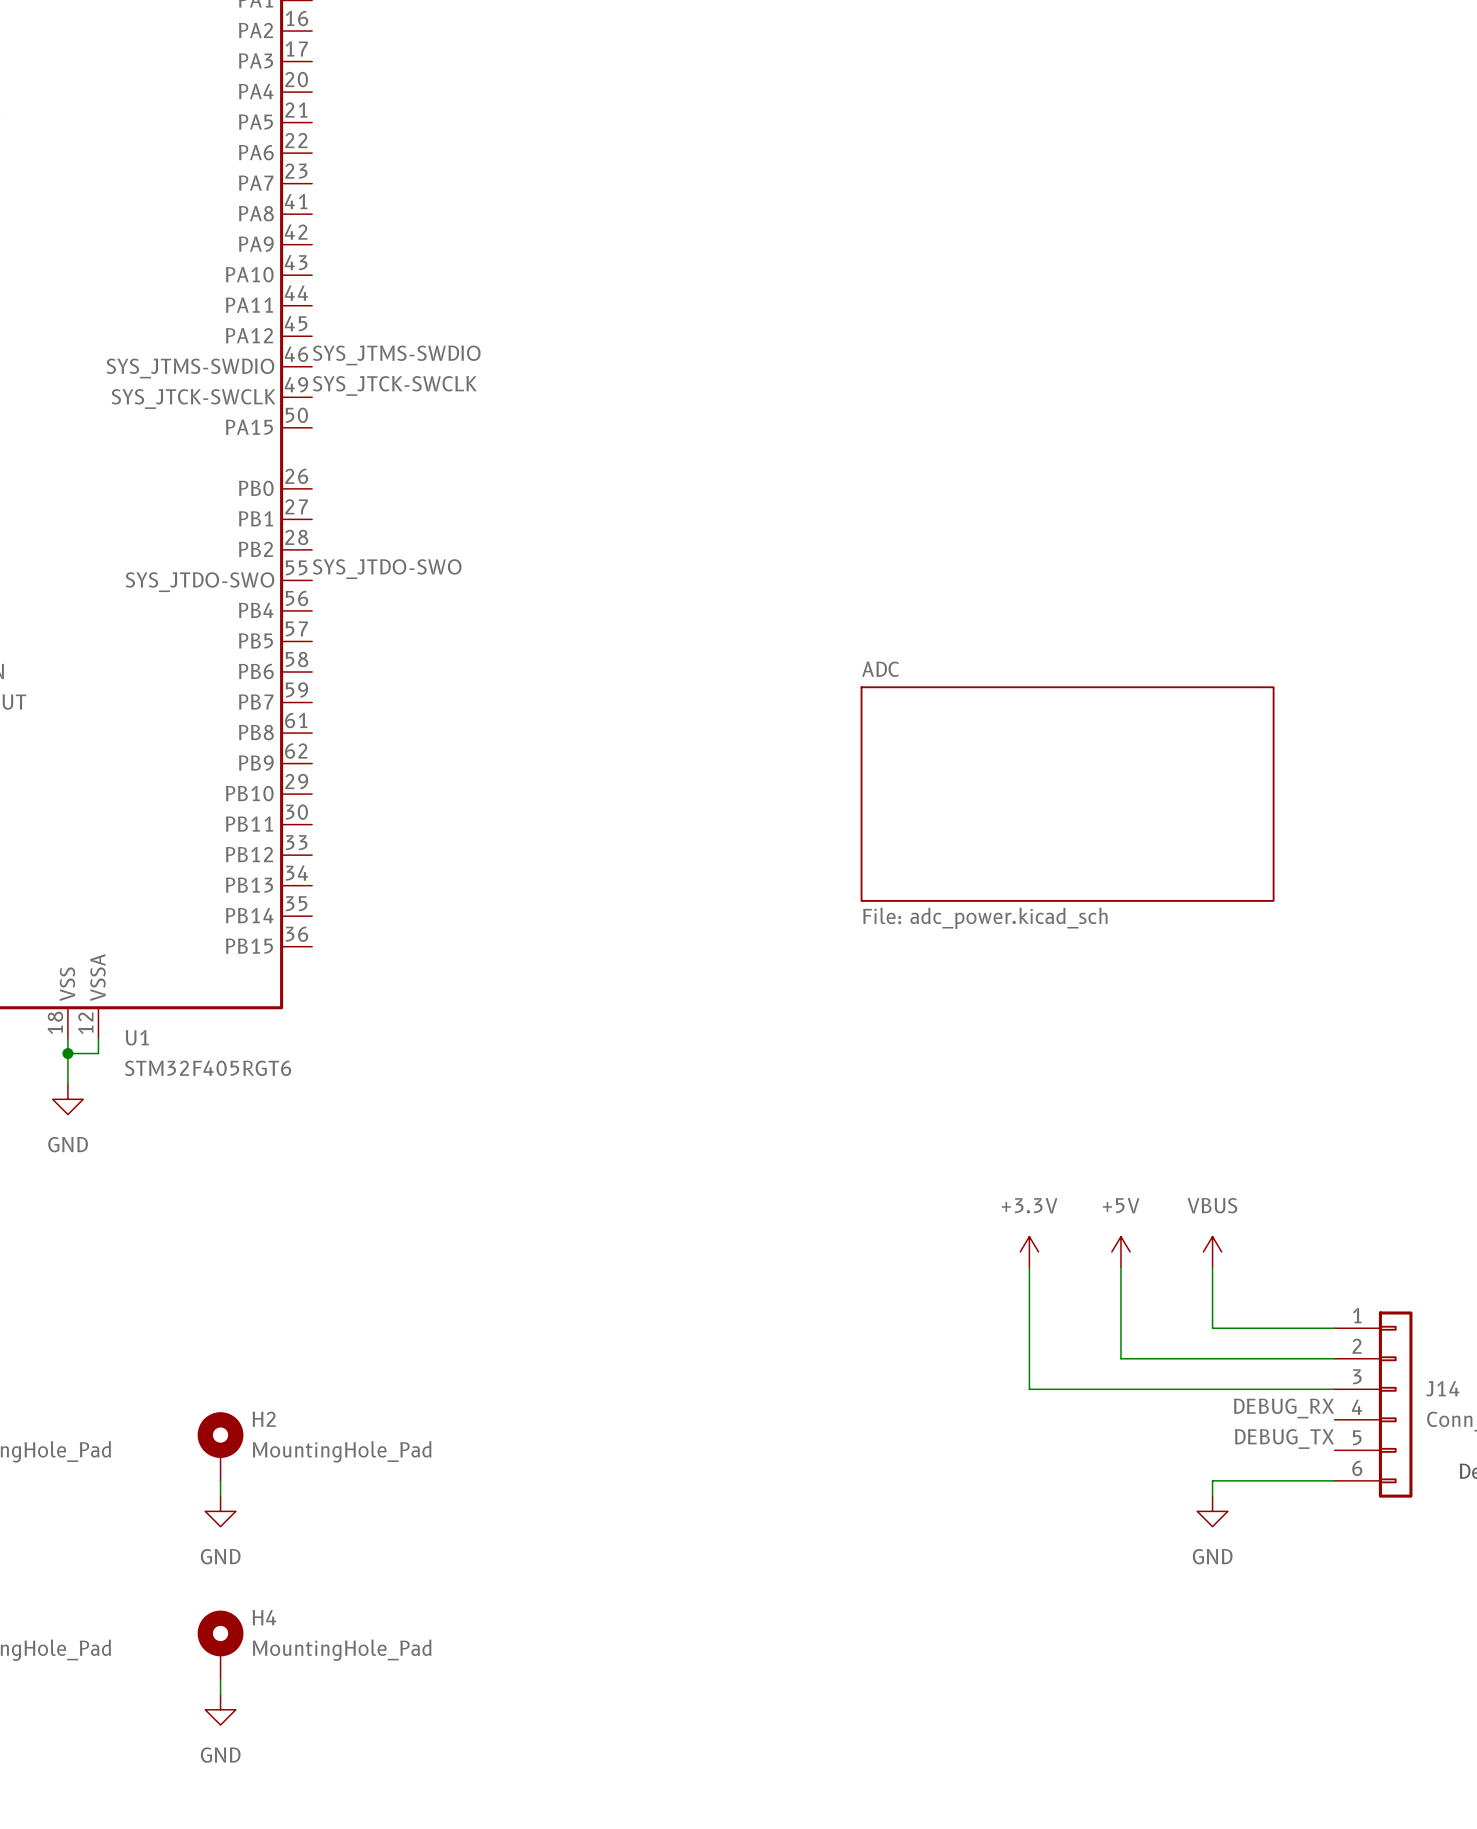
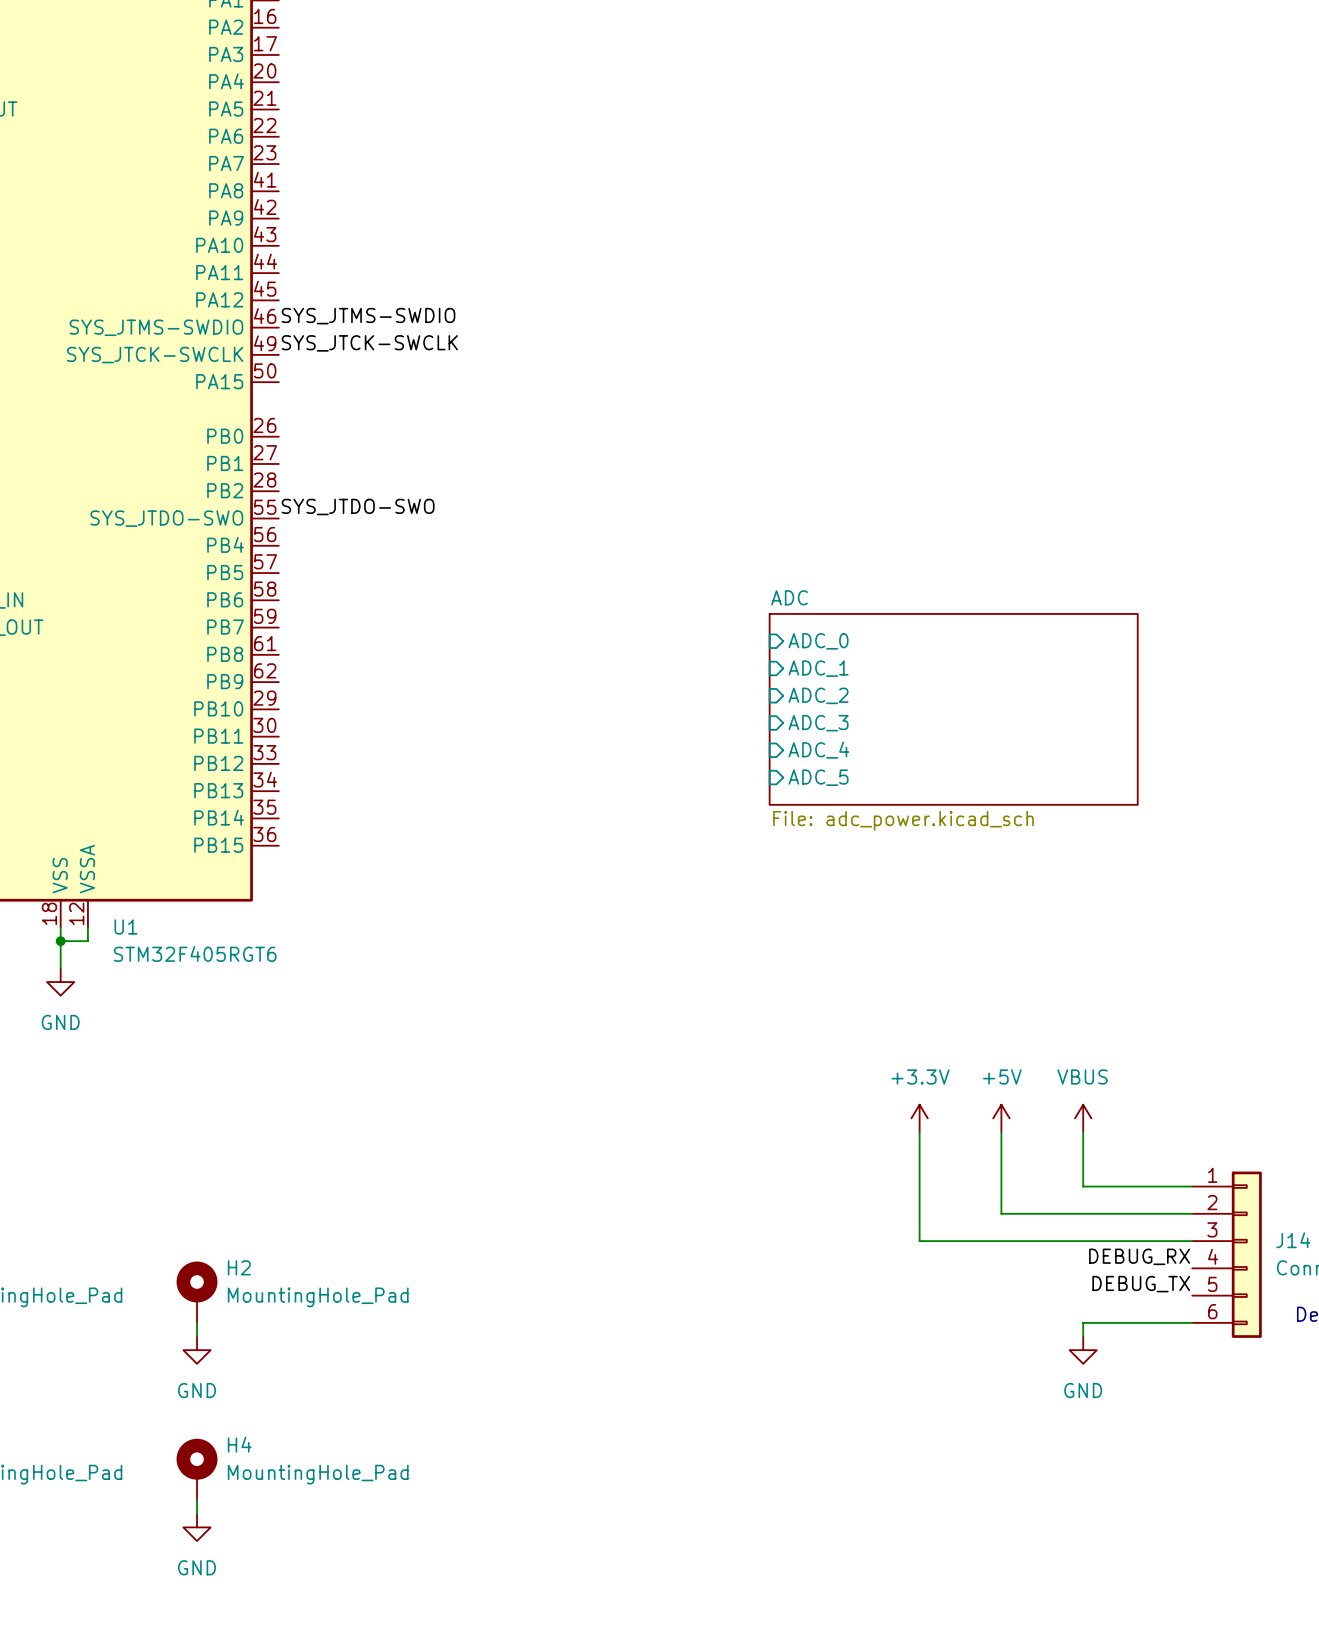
sheet pin: none -> ADC_0 (818, 641)
sheet pin: none -> ADC_1 (818, 668)
sheet pin: none -> ADC_2 (818, 695)
sheet pin: none -> ADC_3 (818, 723)
sheet pin: none -> ADC_4 (818, 750)
sheet pin: none -> ADC_5 (818, 777)

